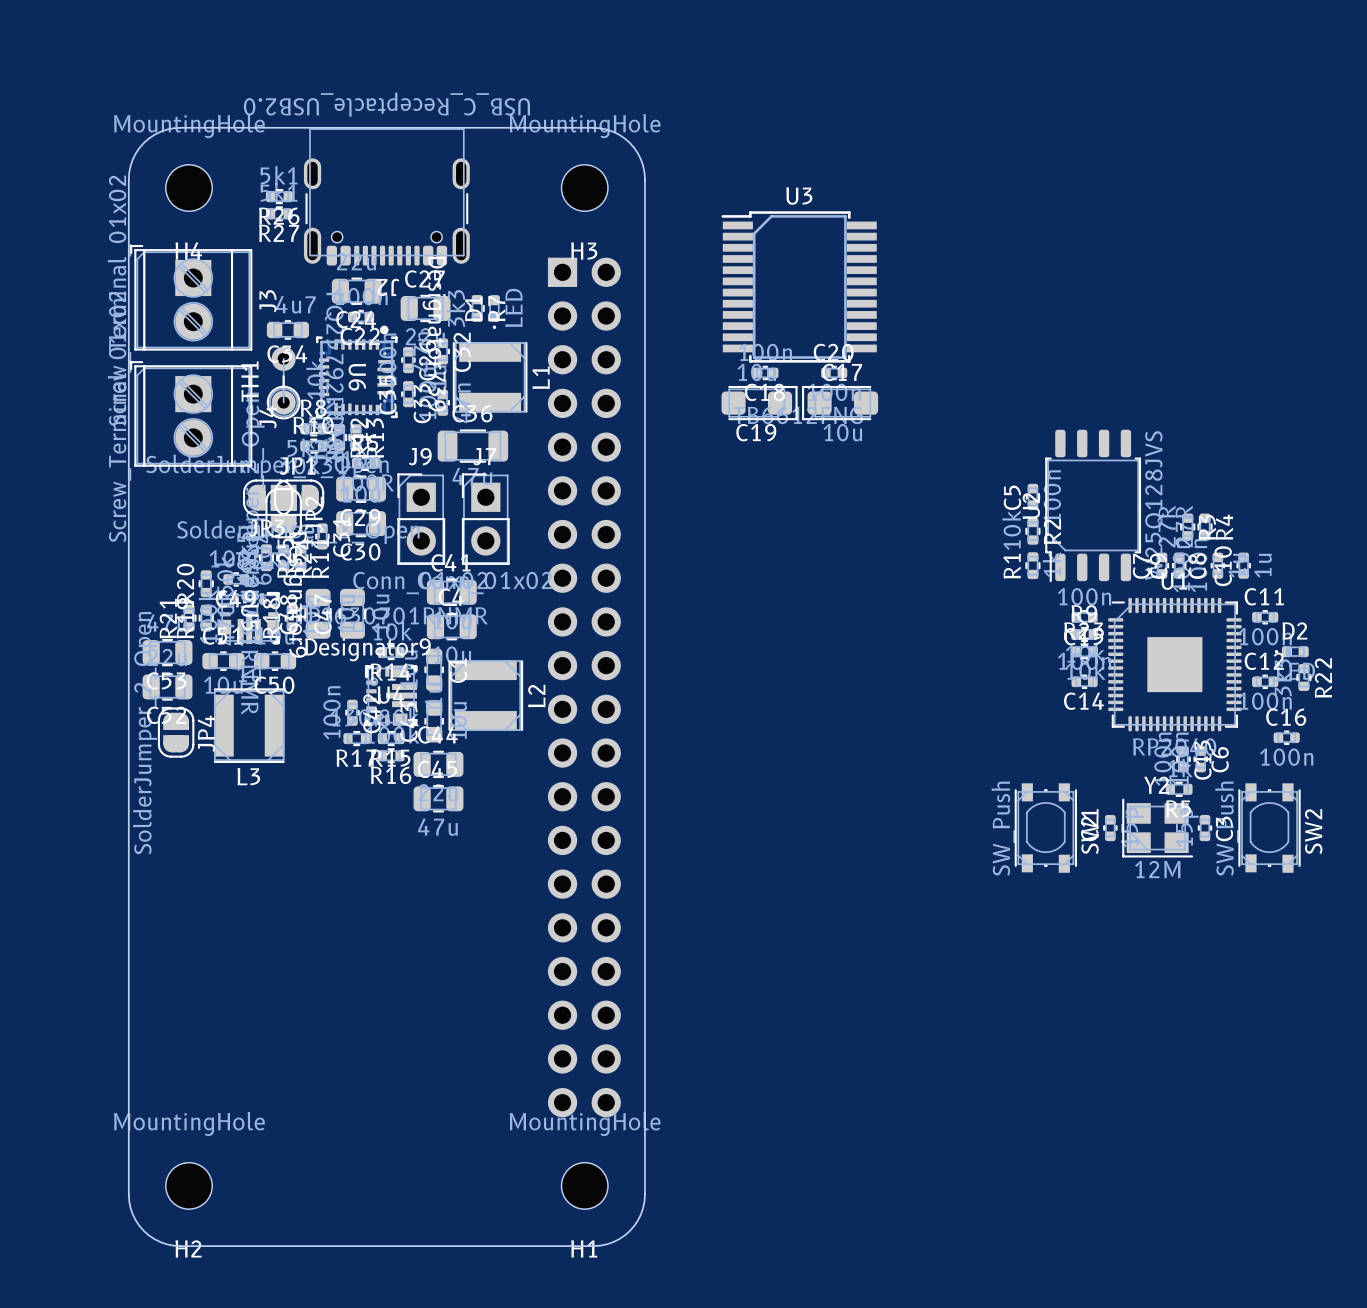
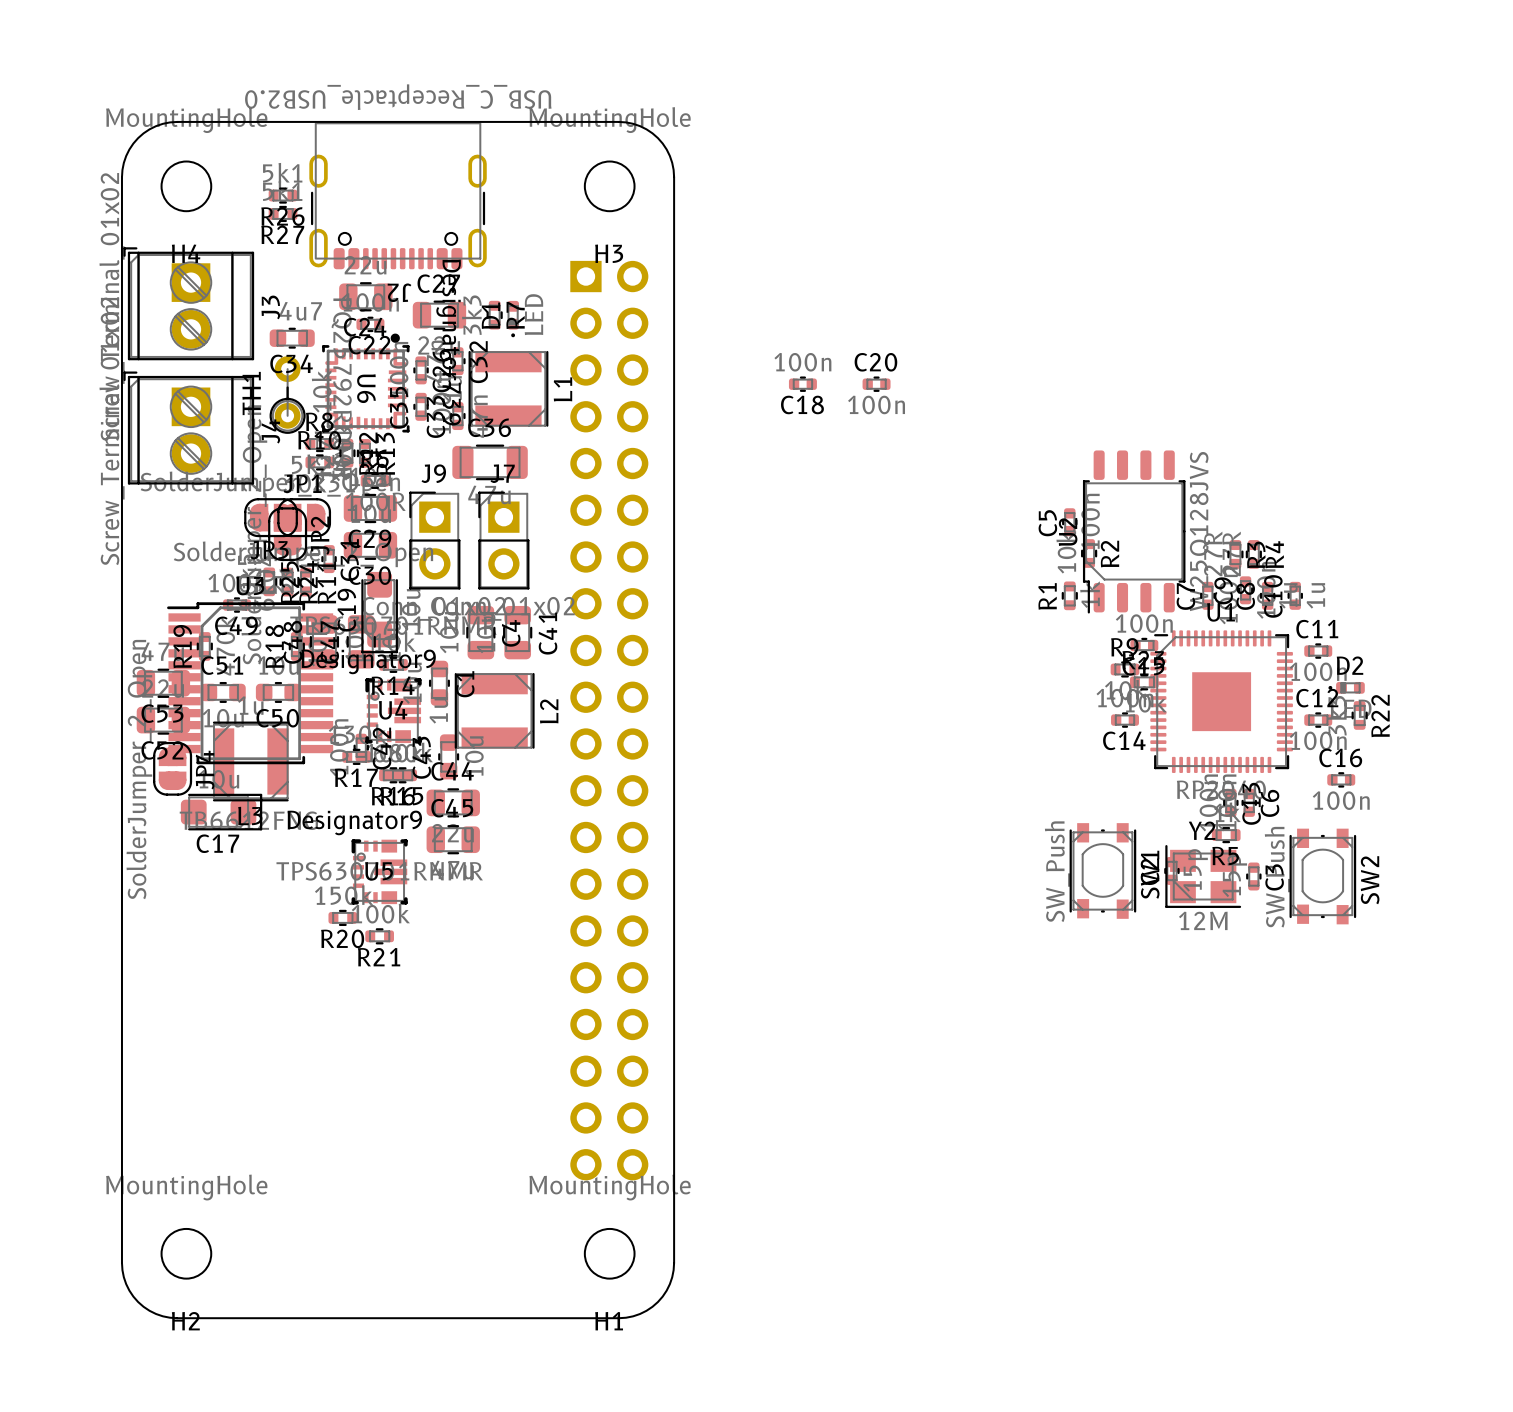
U3 position: (799, 286) -> (250, 683)
C19 rotation: 0° (759, 403) -> 90° clockwise (379, 612)
C19 position: (759, 403) -> (379, 612)
C17 rotation: 0° (840, 403) -> 180° (221, 812)
C17 position: (840, 403) -> (221, 812)
C5 position: (1032, 496) -> (1069, 522)
U2 position: (1093, 505) -> (1134, 531)
R3 position: (1187, 526) -> (1235, 554)
R4 position: (1204, 526) -> (1253, 554)
R1 position: (1032, 565) -> (1069, 595)
C7 position: (1161, 565) -> (1207, 595)
C8 position: (1217, 565) -> (1267, 595)
C10 position: (1243, 565) -> (1295, 595)
R20 rotation: 0° (206, 583) -> 90° clockwise (342, 917)
R20 position: (206, 583) -> (342, 917)
C41 rotation: 0° (451, 592) -> 90° clockwise (517, 632)
C41 position: (451, 592) -> (517, 632)
C11 position: (1265, 617) -> (1318, 651)
R21 rotation: 0° (189, 618) -> 90° clockwise (379, 936)
R21 position: (189, 618) -> (379, 936)
U5 rotation: 0° (249, 618) -> 90° counterclockwise (379, 871)
U5 position: (249, 618) -> (379, 871)
C4 rotation: 0° (451, 626) -> 90° clockwise (480, 632)
R9 position: (1084, 634) -> (1125, 669)
D2 position: (1291, 651) -> (1346, 687)
R14 position: (391, 652) -> (393, 664)
U1 position: (1174, 664) -> (1221, 701)
C1 position: (434, 669) -> (439, 683)
R22 position: (1303, 677) -> (1359, 715)
C14 position: (1084, 681) -> (1125, 720)
C12 position: (1265, 681) -> (1318, 720)
U4 position: (391, 695) -> (393, 710)
L2 position: (485, 695) -> (494, 710)
C16 position: (1286, 737) -> (1341, 779)
R17 position: (356, 738) -> (356, 756)
R16 position: (391, 755) -> (393, 775)
C13 position: (1183, 759) -> (1230, 802)
C6 position: (1200, 759) -> (1249, 802)
R5 position: (1179, 789) -> (1226, 835)
Y2 position: (1157, 828) -> (1203, 876)
C3 position: (1204, 828) -> (1253, 876)
SW2 position: (1269, 828) -> (1322, 876)

